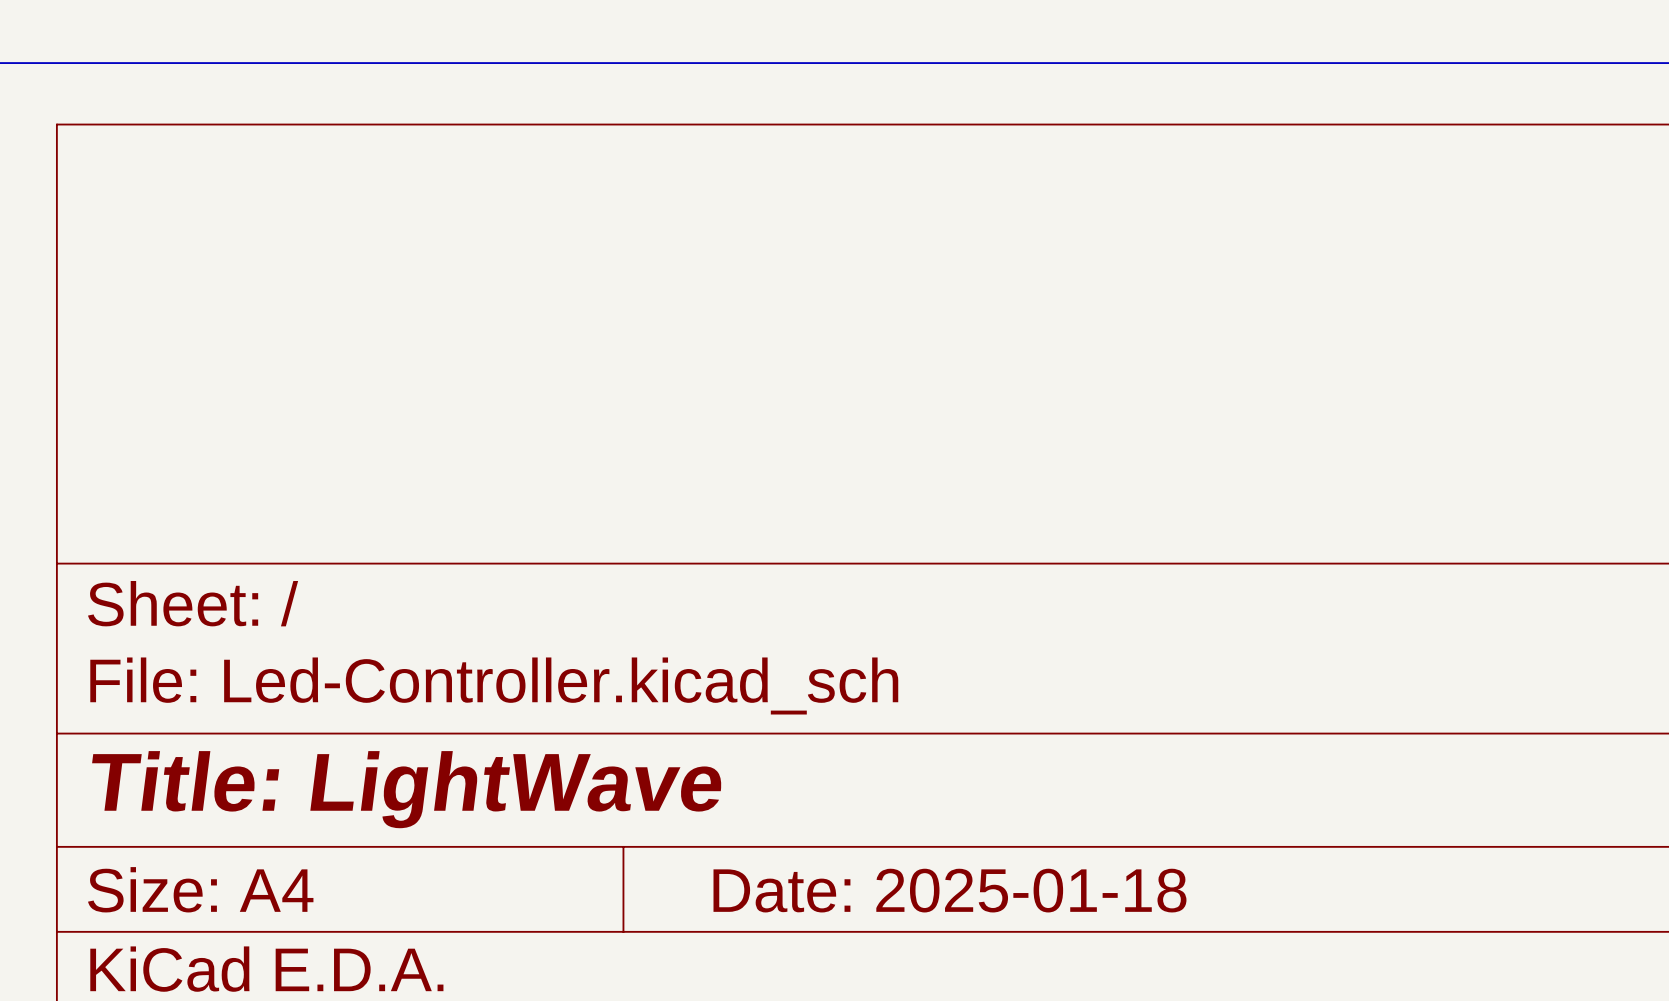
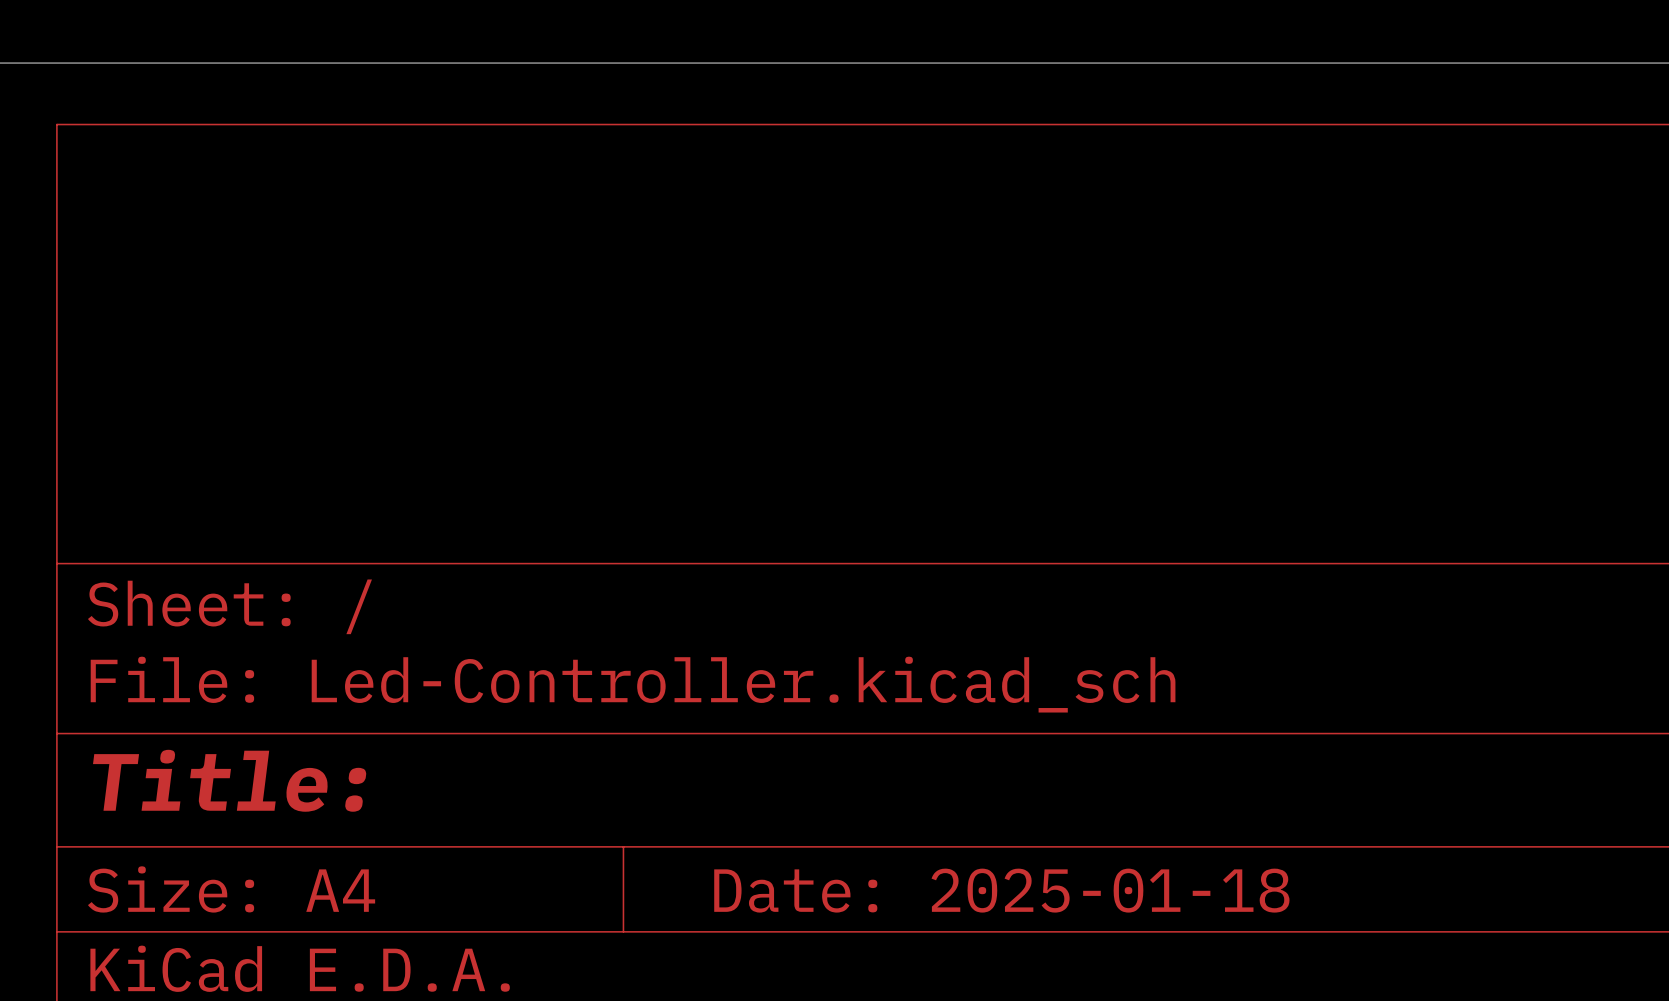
title block: Title: LightWave (407, 789) -> Title: (229, 780)

